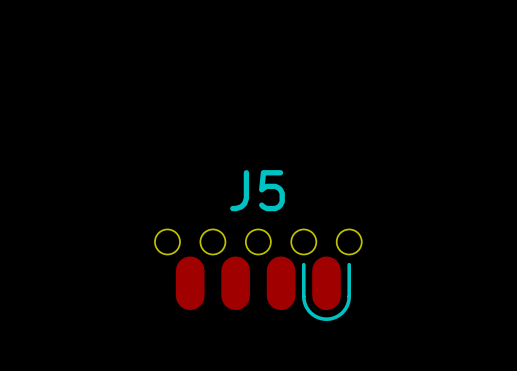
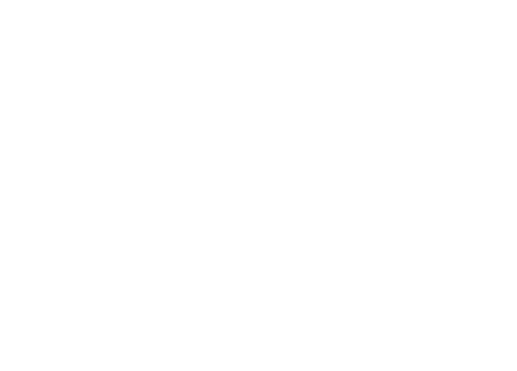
J5: (258, 275) -> none

